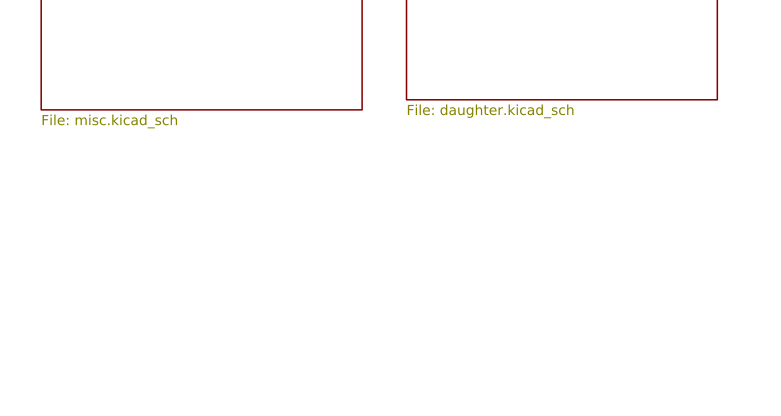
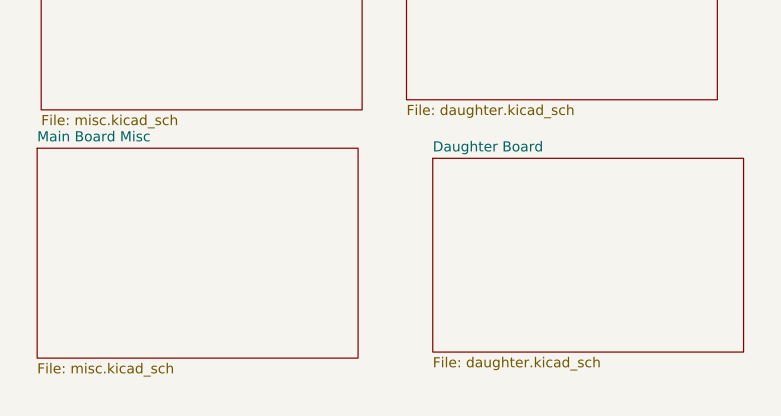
sheet Main Board Misc: none -> File: misc.kicad_sch (197, 253)
sheet Daughter Board: none -> File: daughter.kicad_sch (588, 255)

